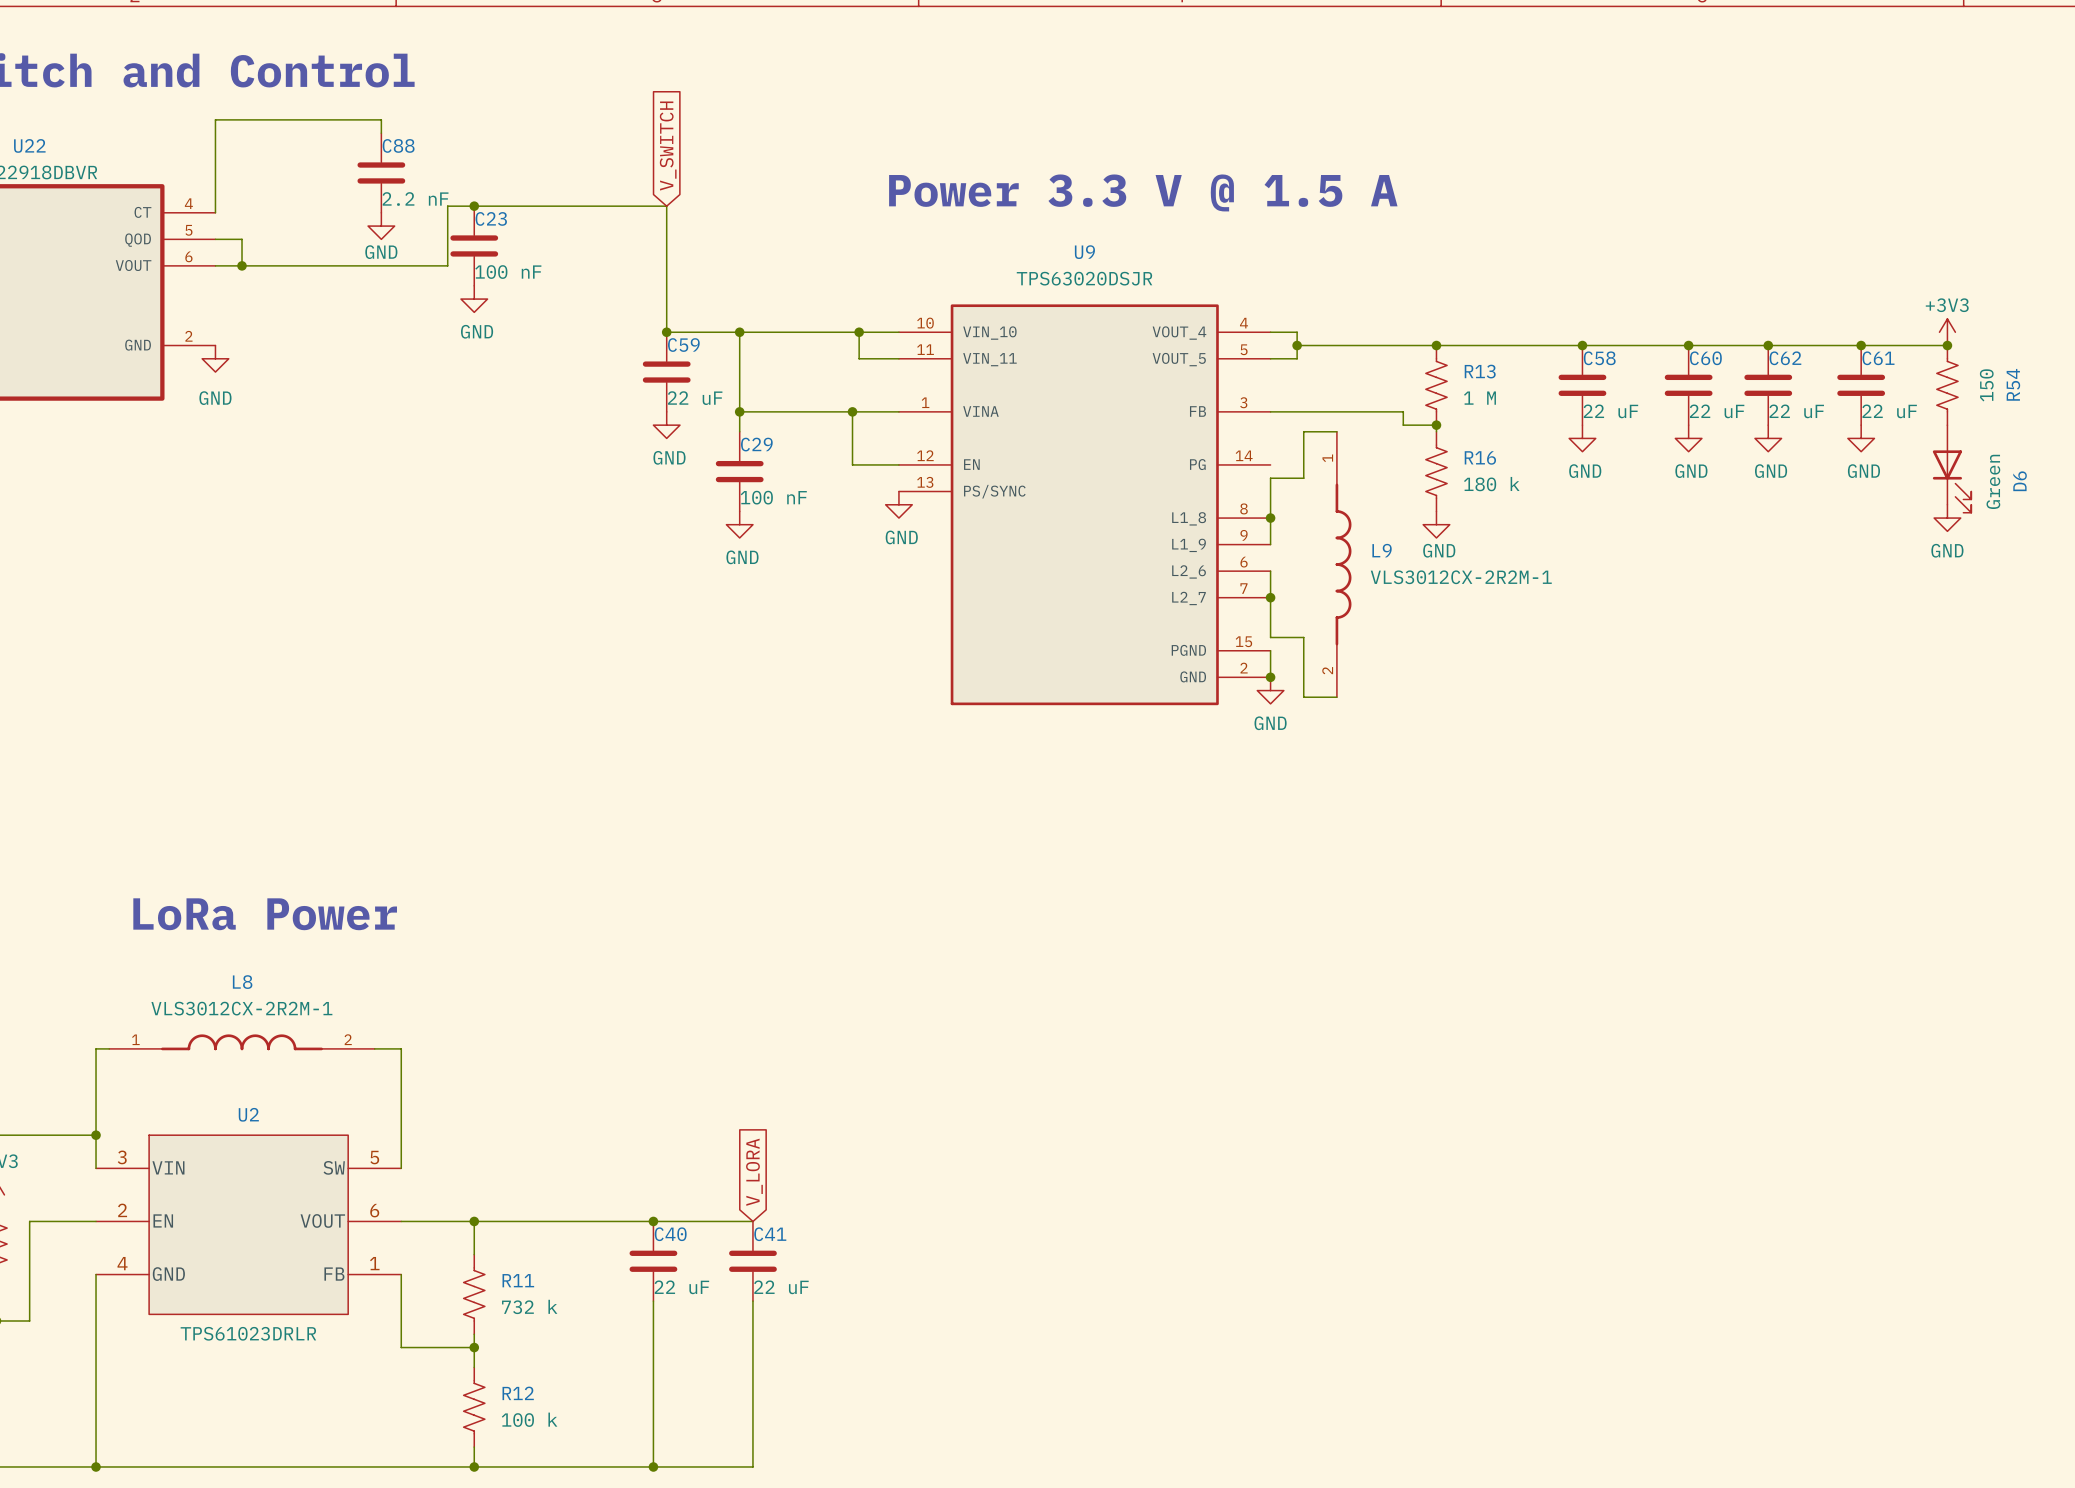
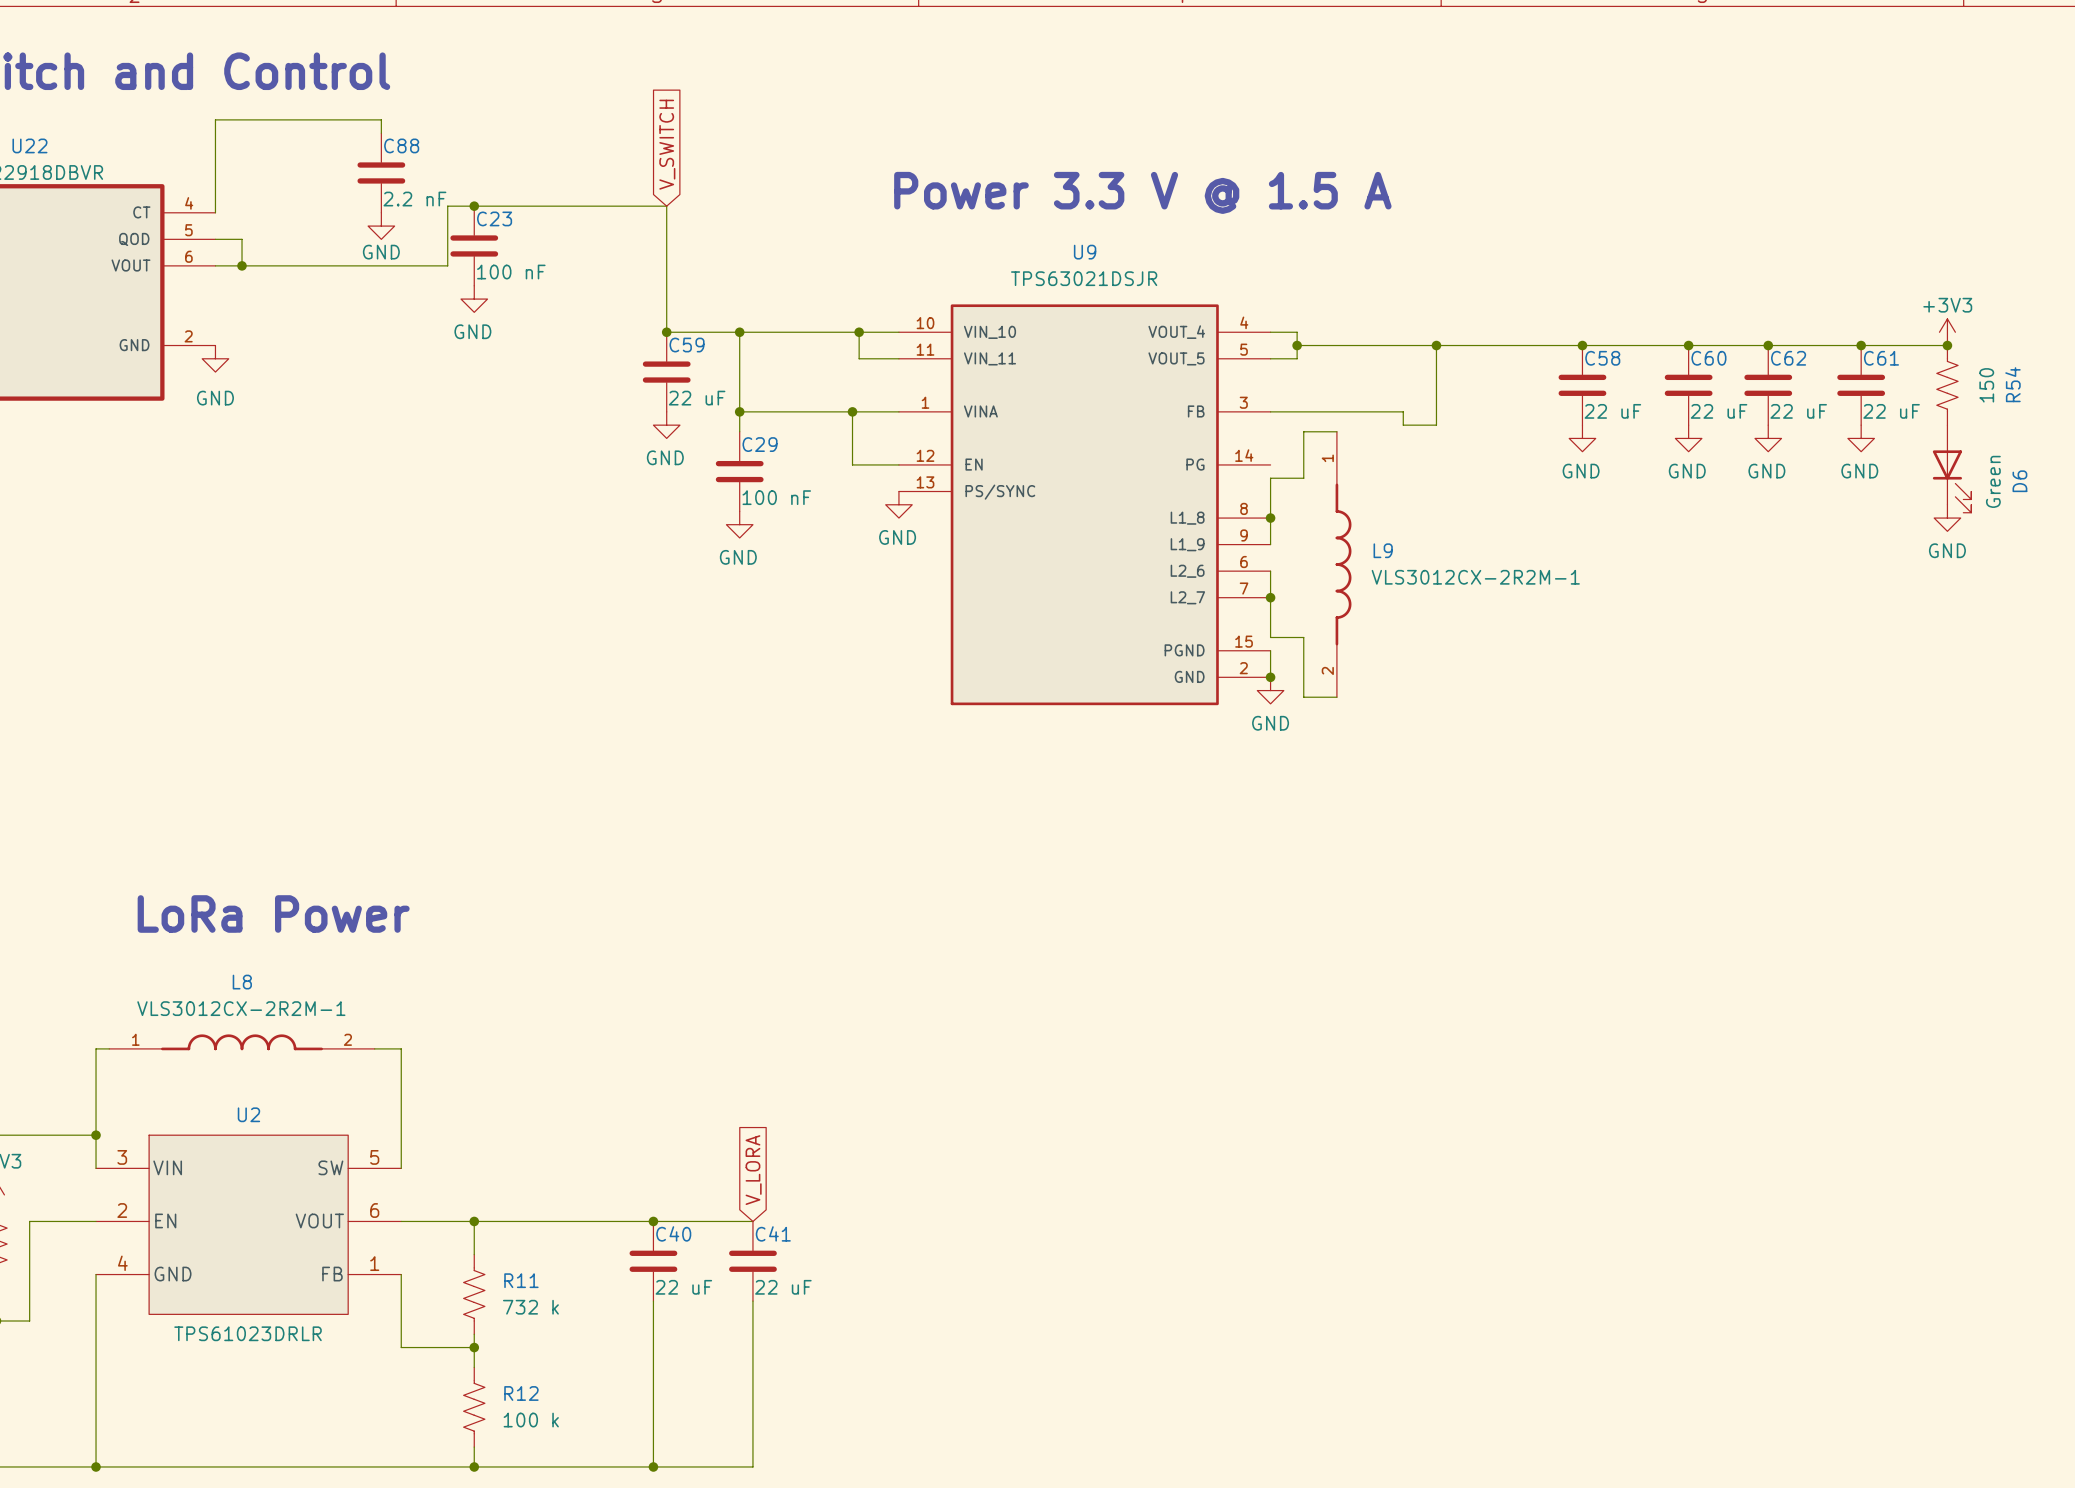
U9 value: TPS63020DSJR (1084, 278) -> TPS63021DSJR (1084, 278)
R13: 1 M (1436, 385) -> none
junction: (1436, 425) -> none
R16: 180 k (1436, 471) -> none
power symbol: GND (1436, 524) -> none

